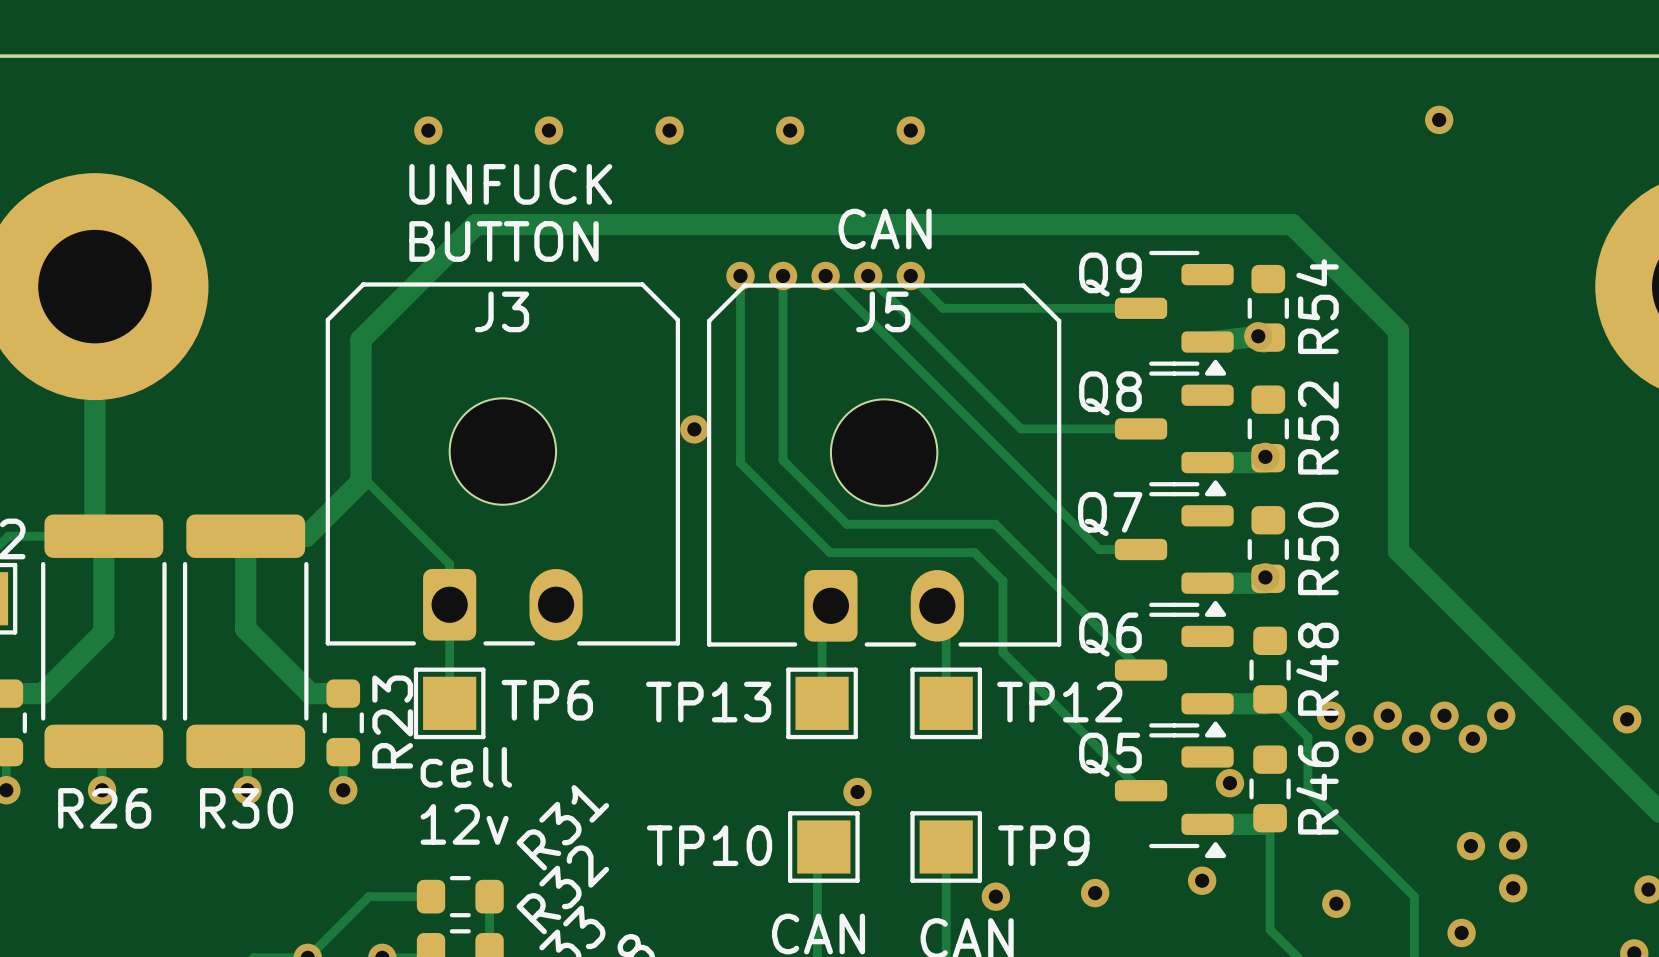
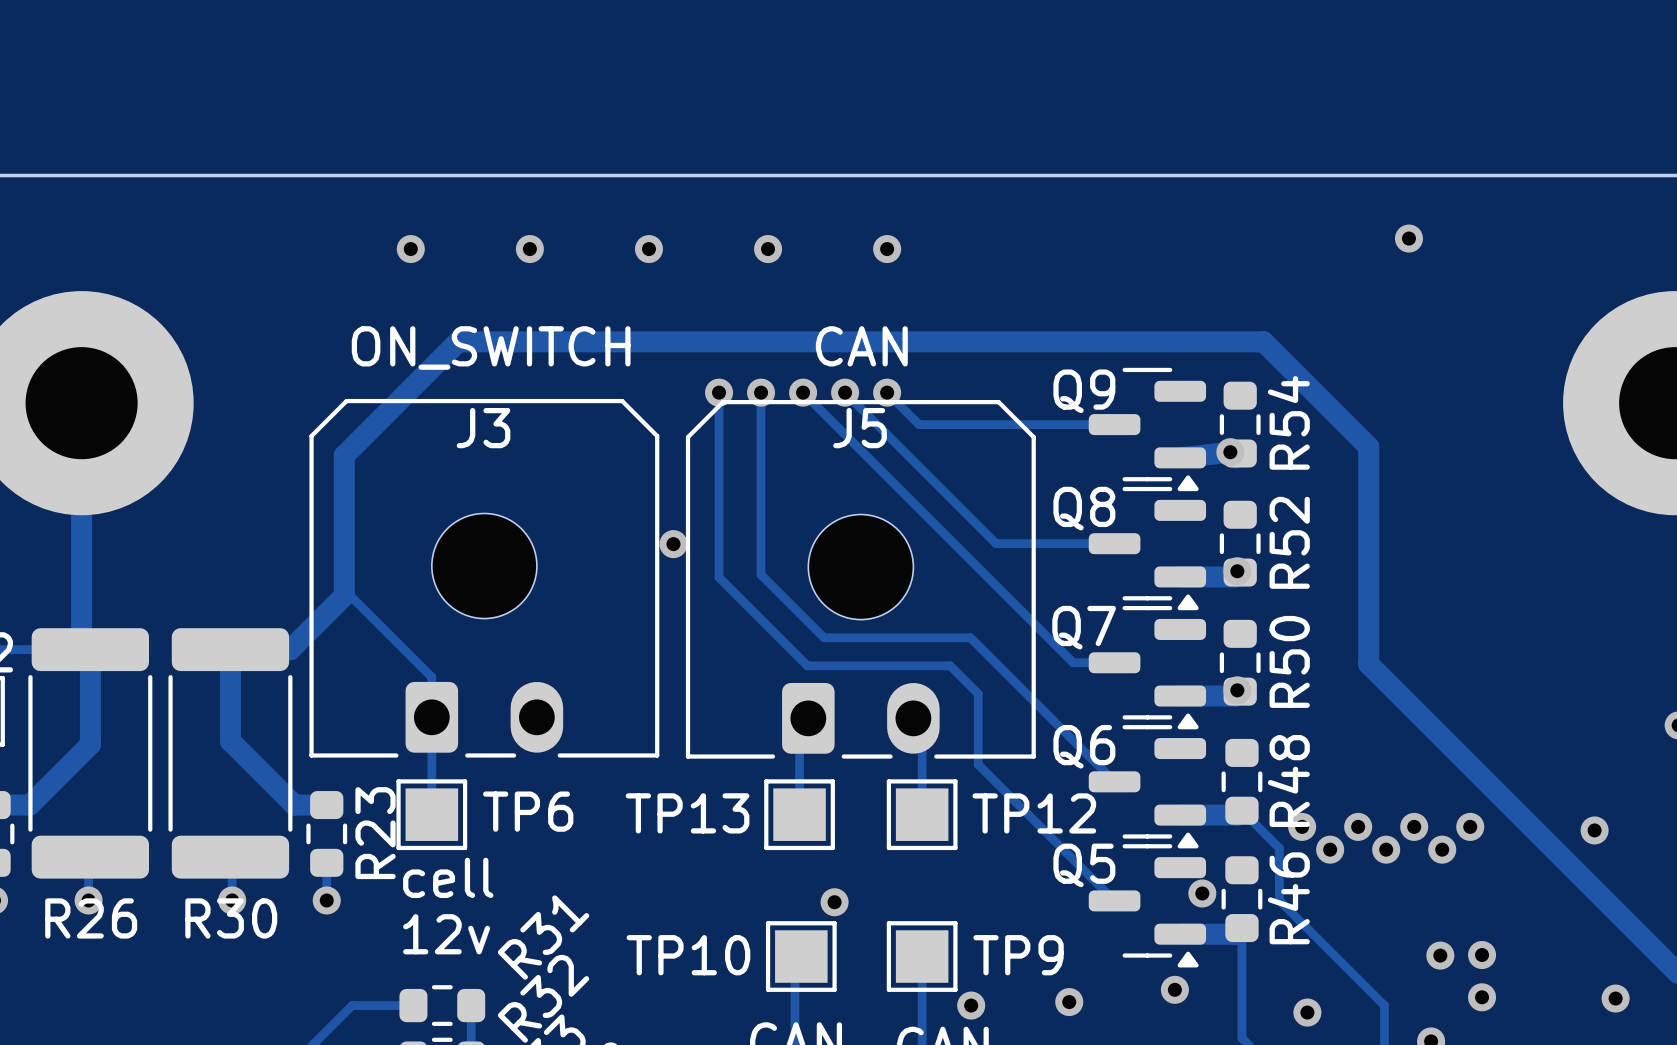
text: UNFUCK (510, 184) -> none
text: none -> ON_SWITCH (491, 348)
text: BUTTON (503, 241) -> none

